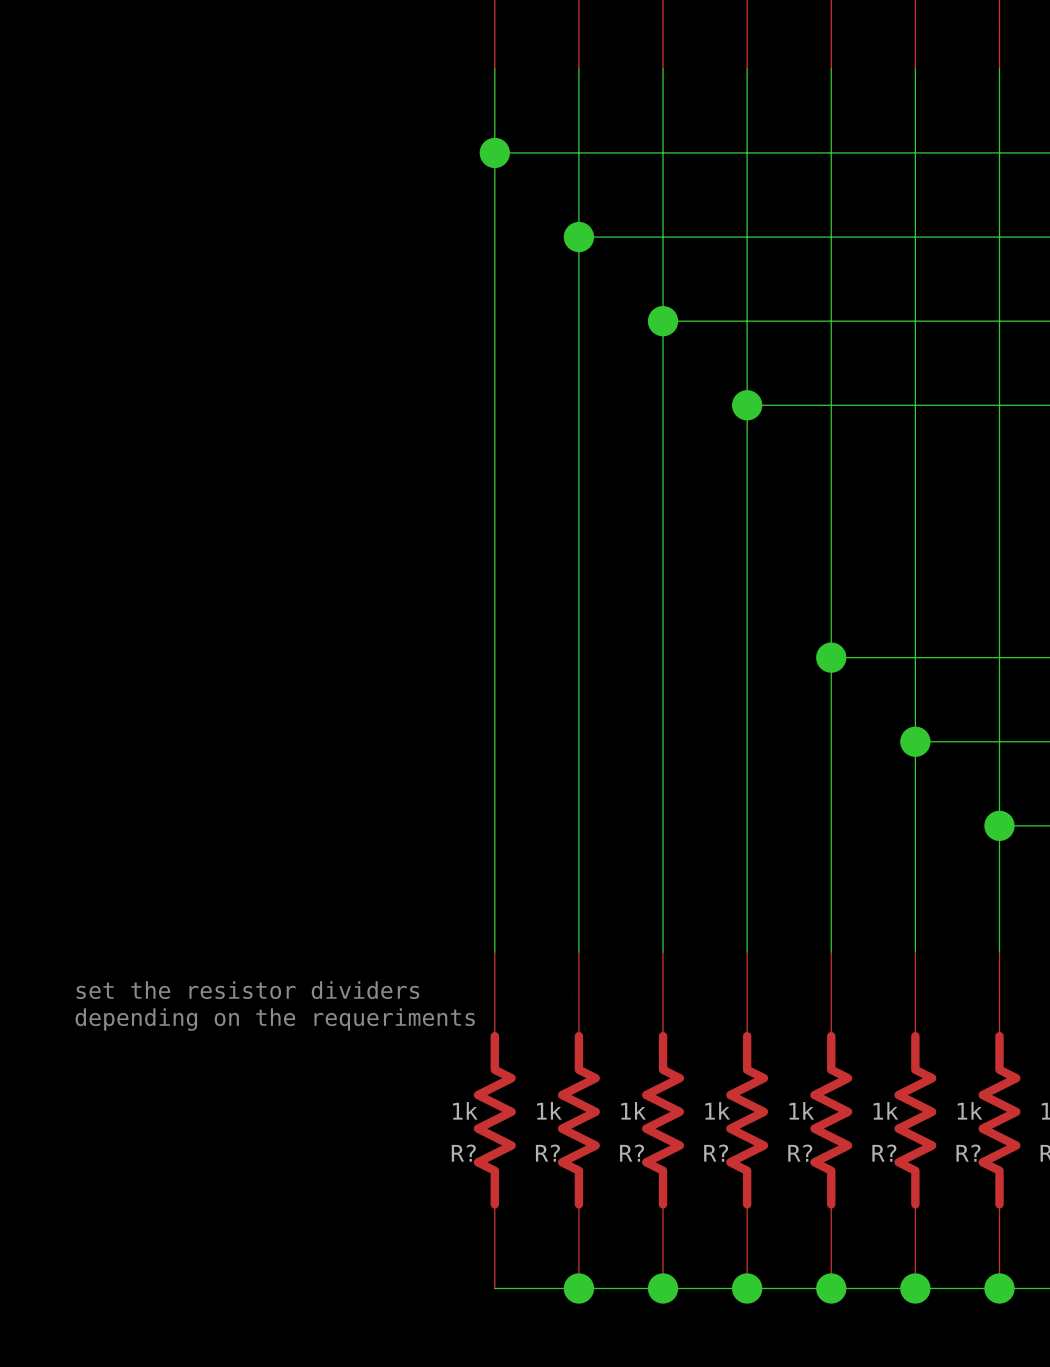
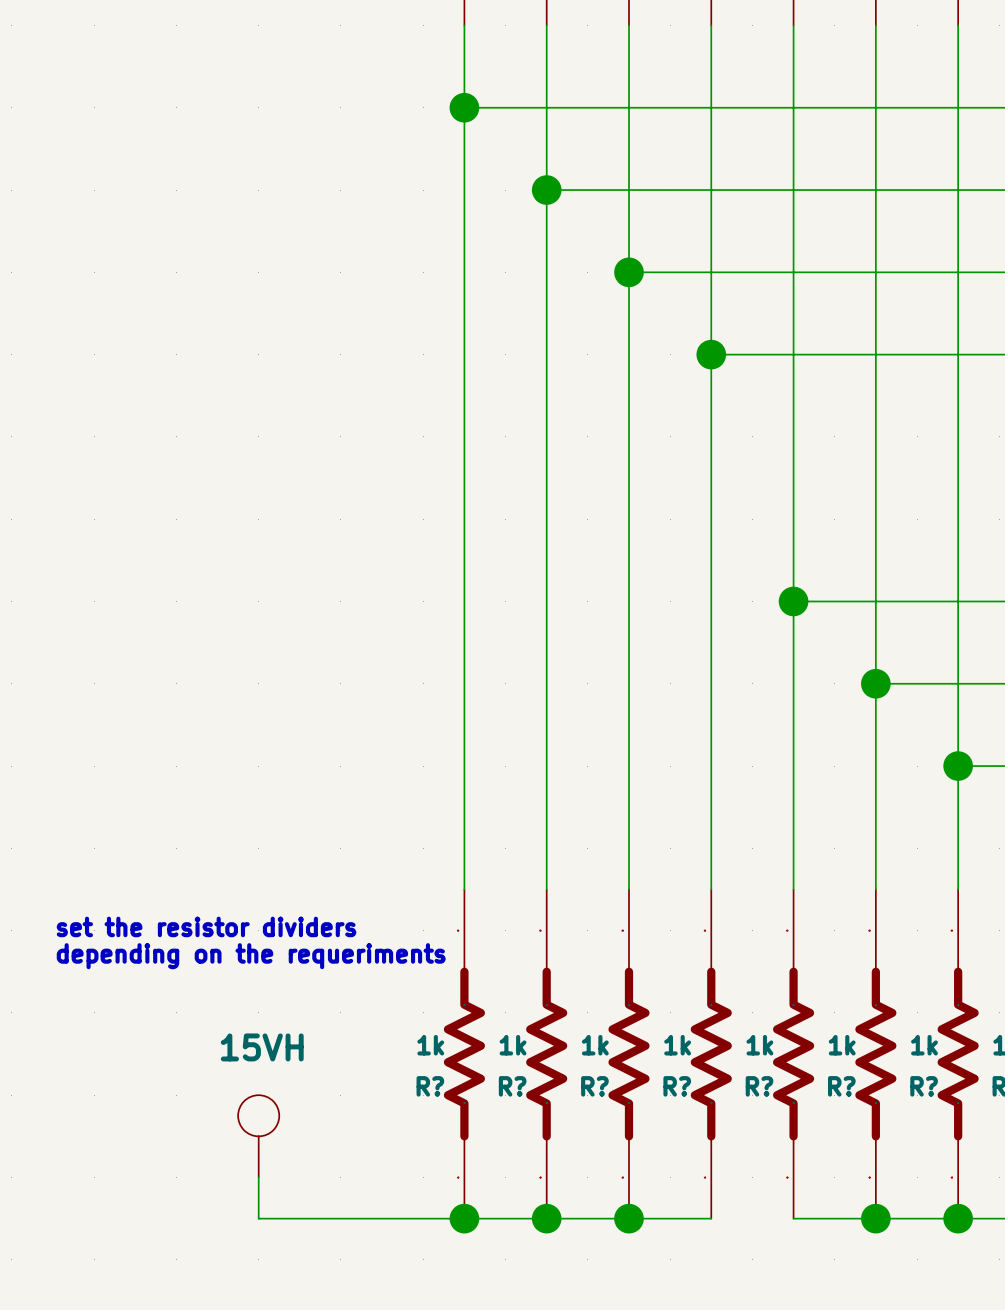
power symbol: none -> 15VH (258, 1136)
wire: none -> (258, 1177) (258, 1218) (464, 1218)
junction: none -> (464, 1218)
wire: (747, 1288) (831, 1288) -> none
junction: (747, 1288) -> none
junction: (831, 1288) -> none

